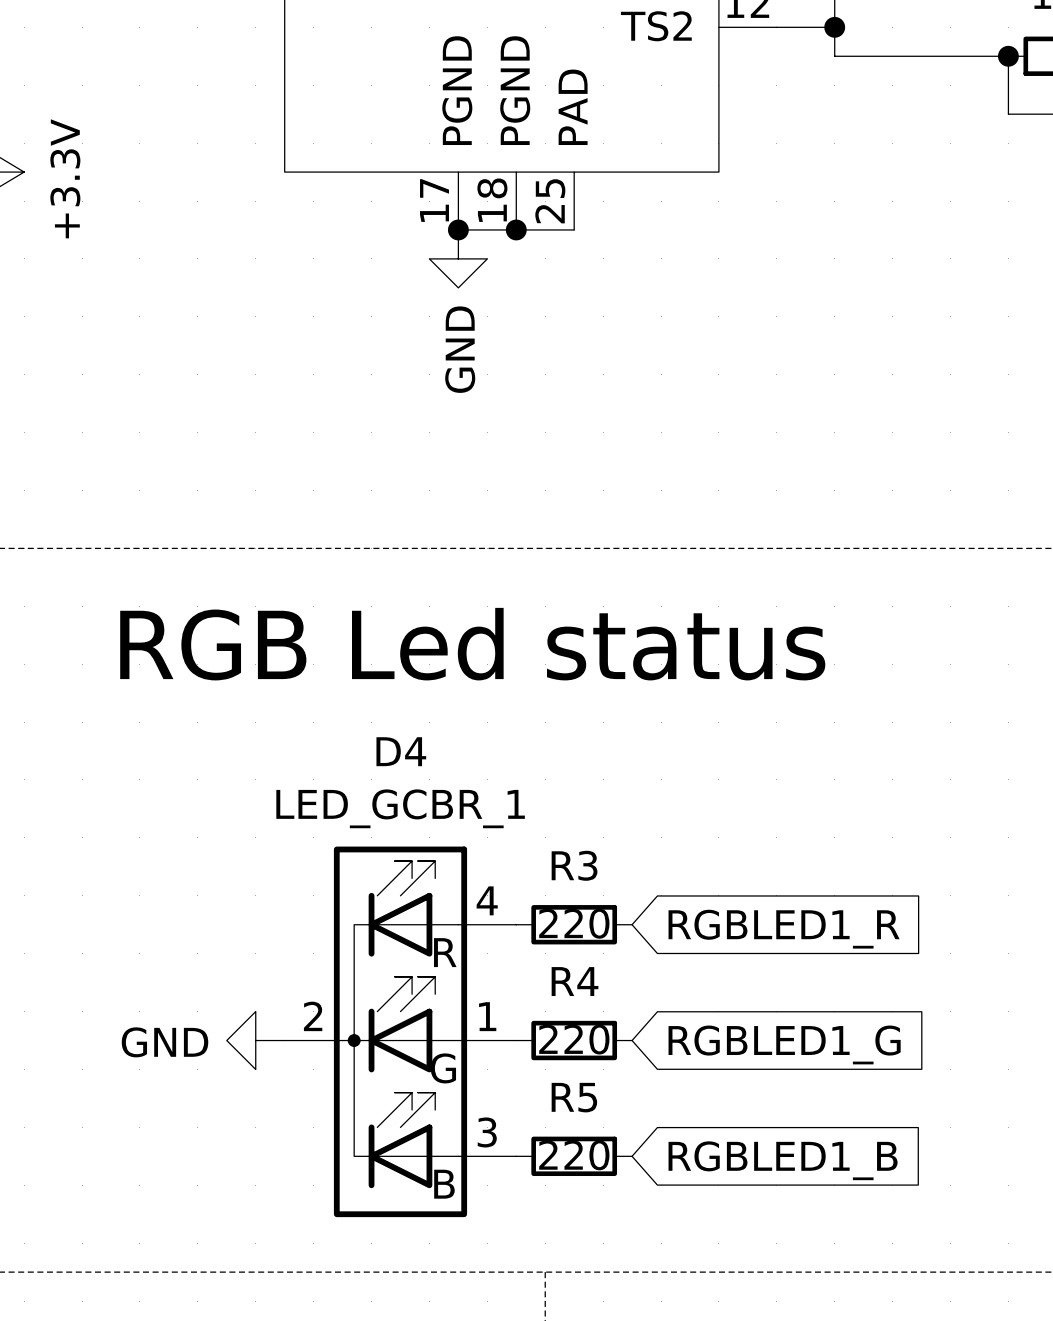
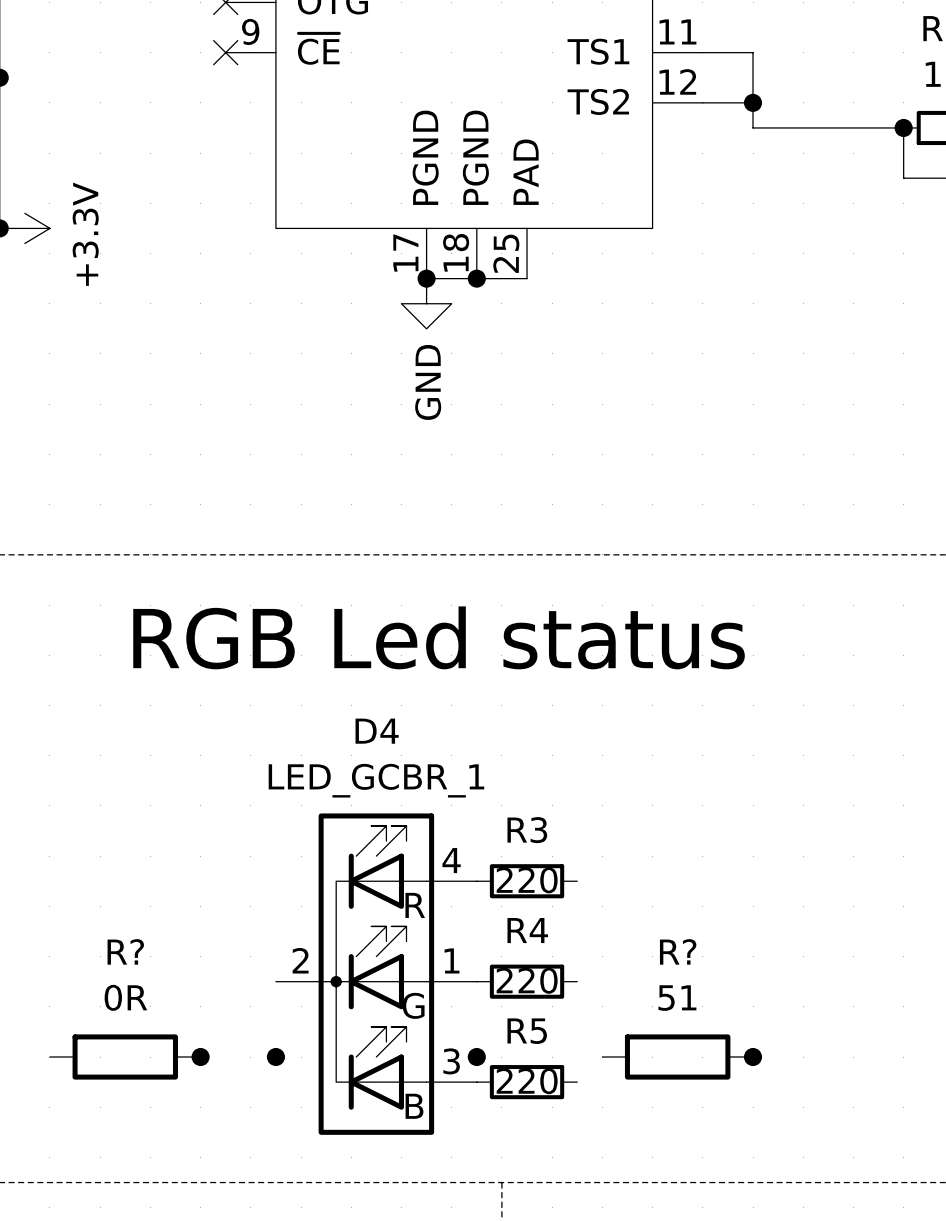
global label: RGBLED1_R (784, 929) -> none
power symbol: GND (255, 1040) -> none
global label: RGBLED1_G (784, 1044) -> none
R?: none -> 0R (125, 1057)
junction: none -> (200, 1057)
junction: none -> (275, 1057)
junction: none -> (476, 1057)
R?: none -> 51 (677, 1057)
junction: none -> (753, 1057)
global label: RGBLED1_B (783, 1160) -> none

